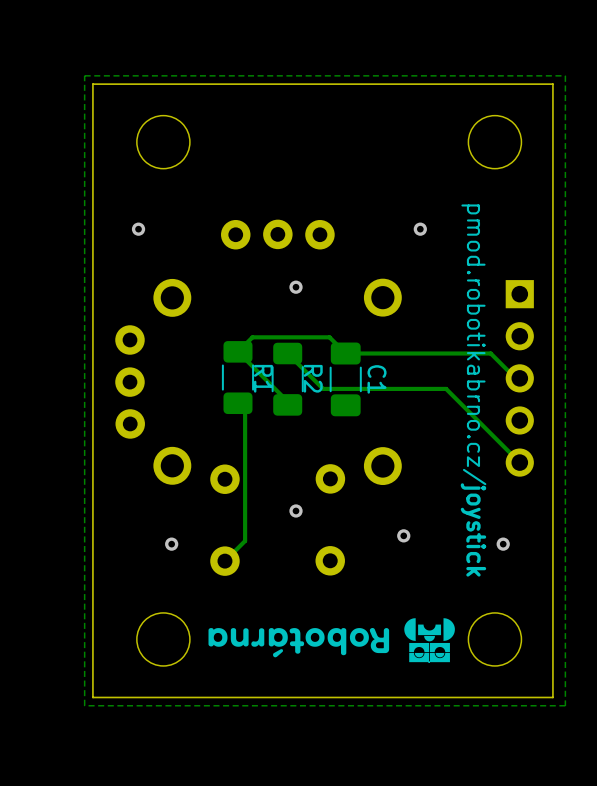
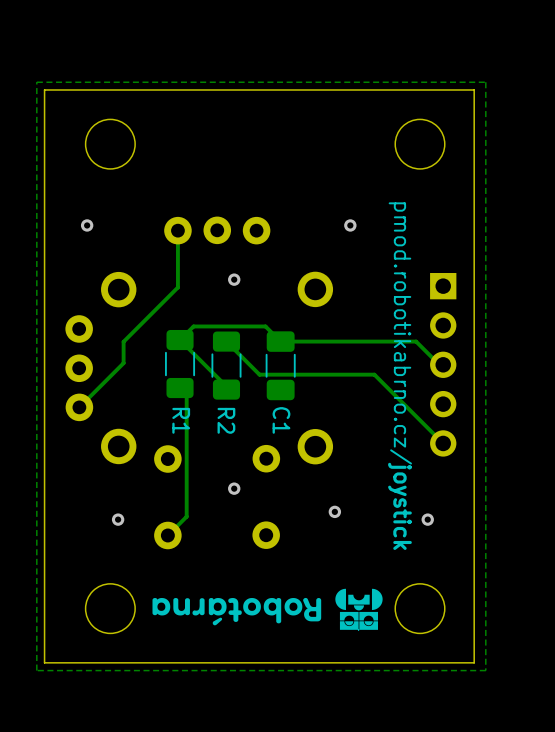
track: none -> (177, 230) (177, 287) (123, 341) (123, 363) (79, 407)
R1 name position: R1 (263, 378) -> R1 (181, 420)
R2 name position: R2 (313, 378) -> R2 (226, 420)
C1 name position: C1 (377, 379) -> C1 (281, 420)

